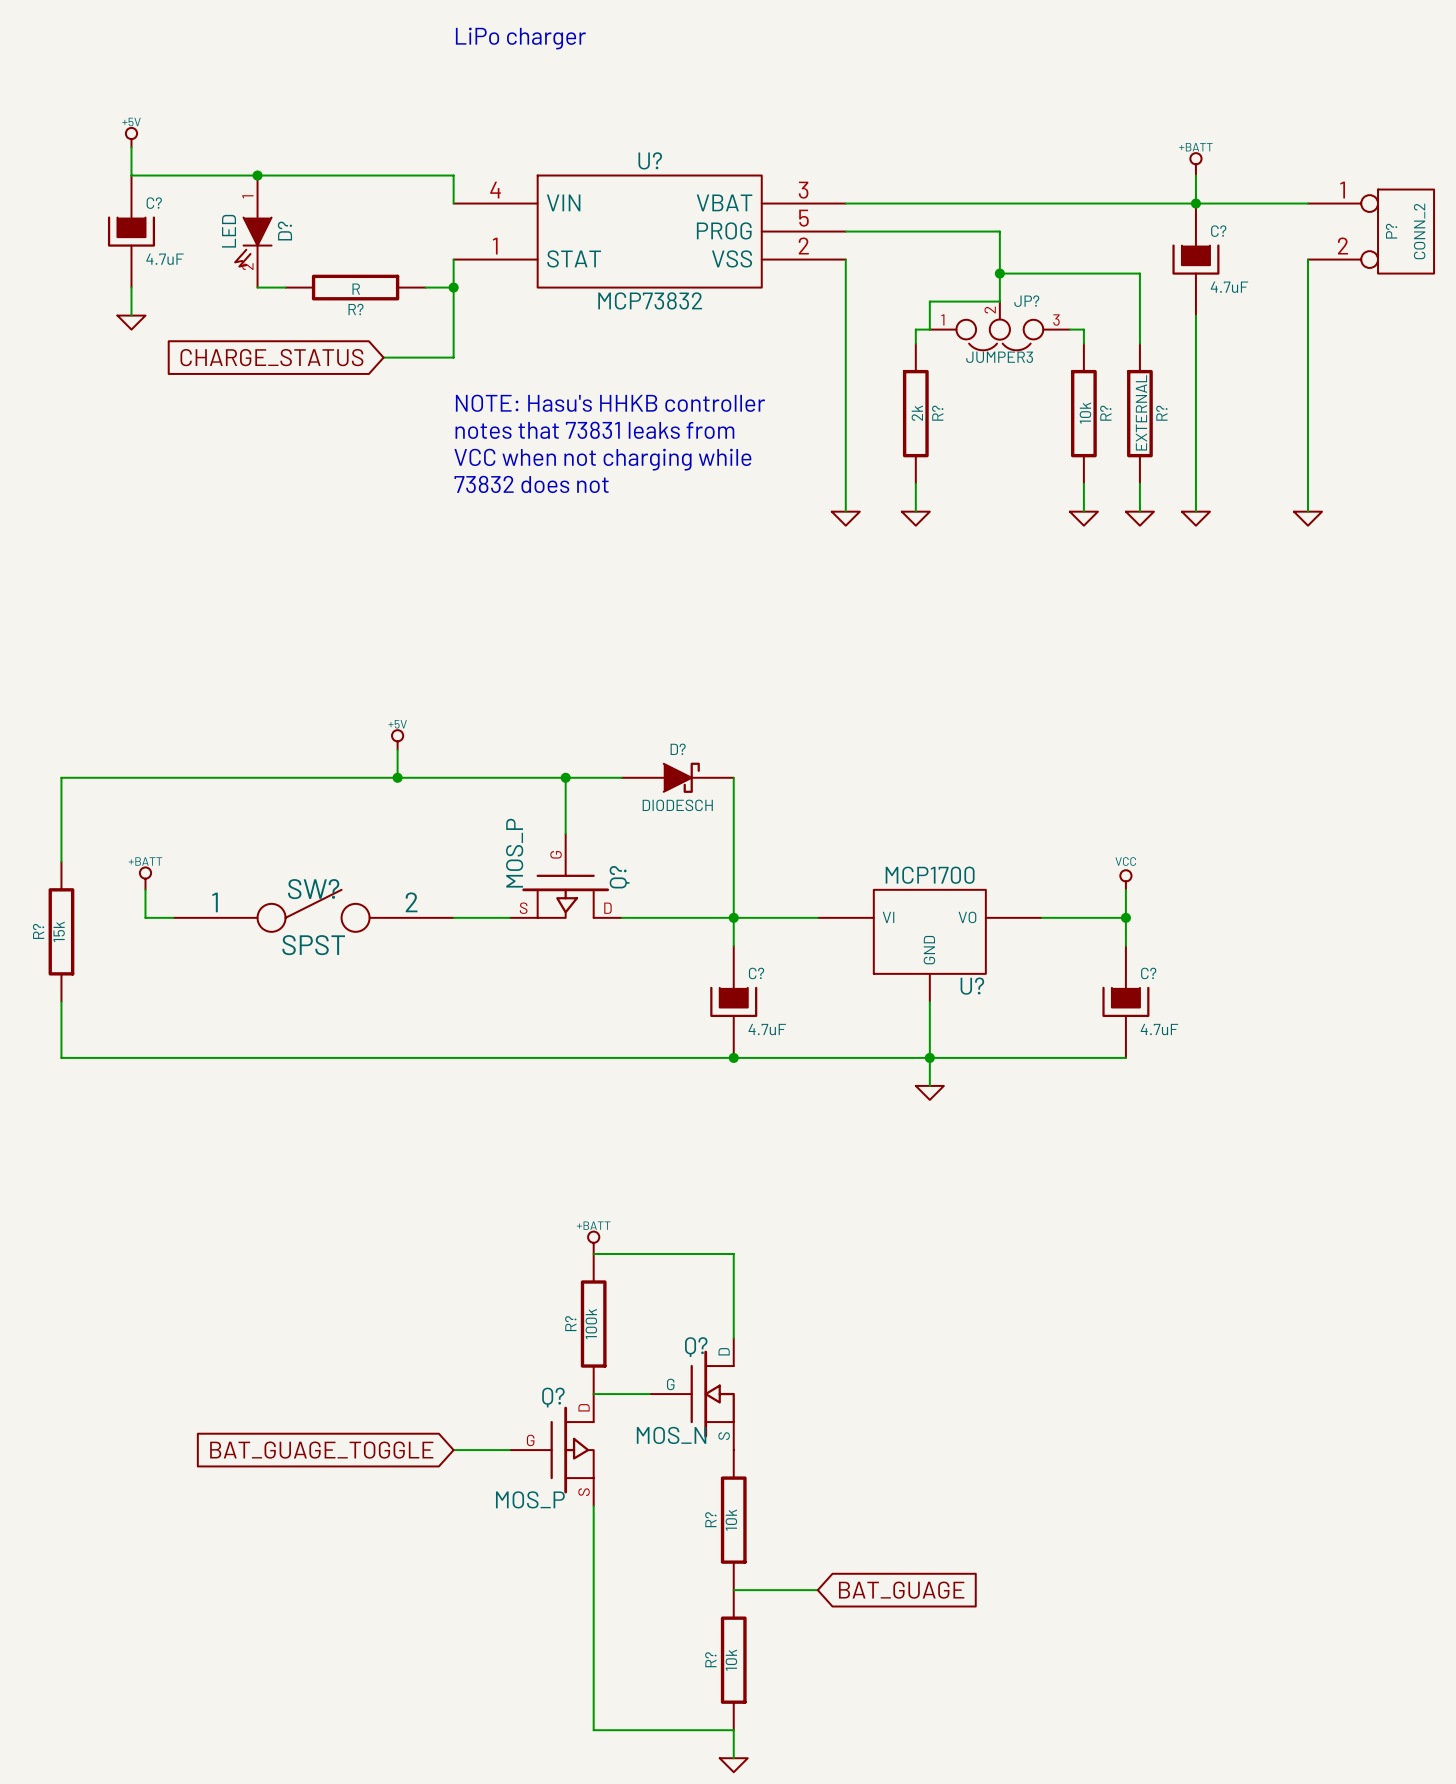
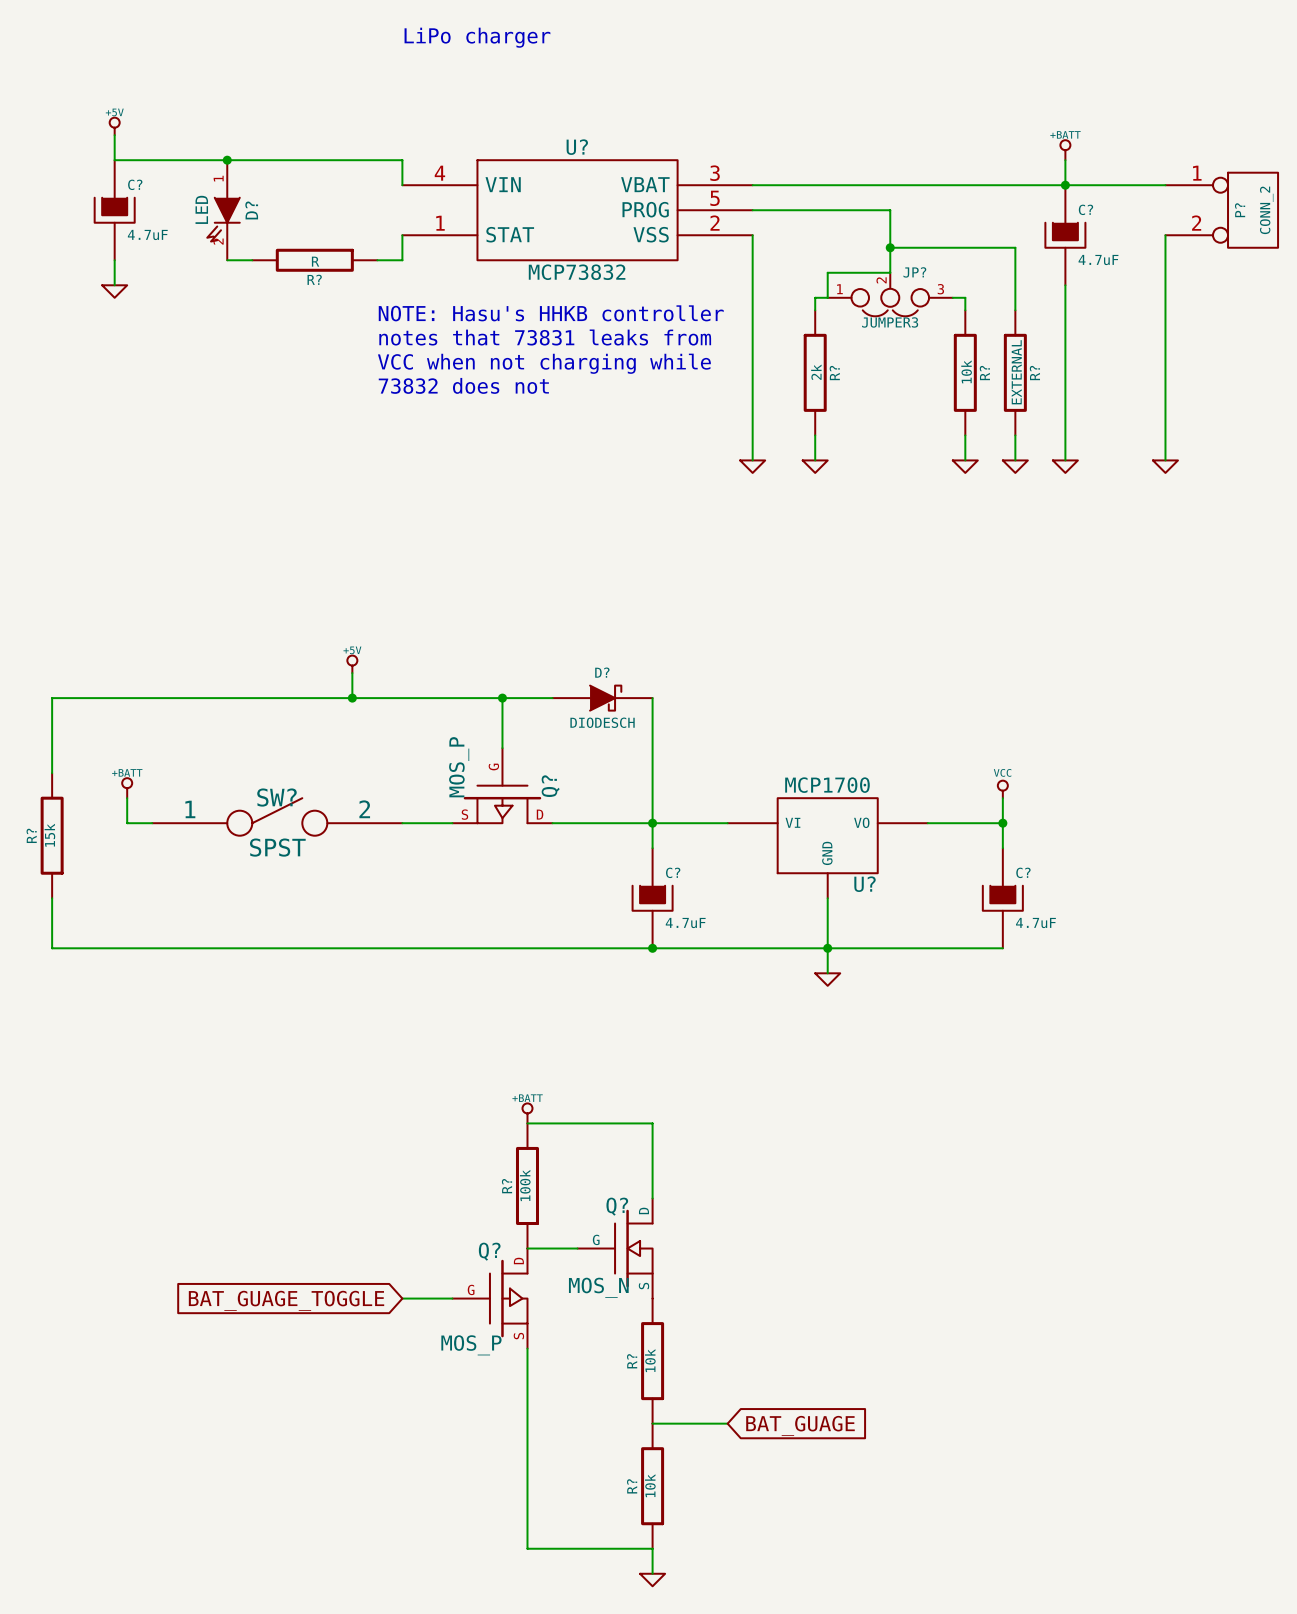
wire: (453, 287) (453, 357) (383, 357) -> none
junction: (453, 287) -> none
global label: CHARGE_STATUS (271, 357) -> none
text position: NOTE: Hasu's HHKB controller (610, 403) -> NOTE: Hasu's HHKB controller (551, 313)
text position: notes that 73831 leaks from (594, 430) -> notes that 73831 leaks from (545, 337)
text position: VCC when not charging while (602, 459) -> VCC when not charging while (544, 363)
text position: 73832 does not (531, 484) -> 73832 does not (463, 385)

